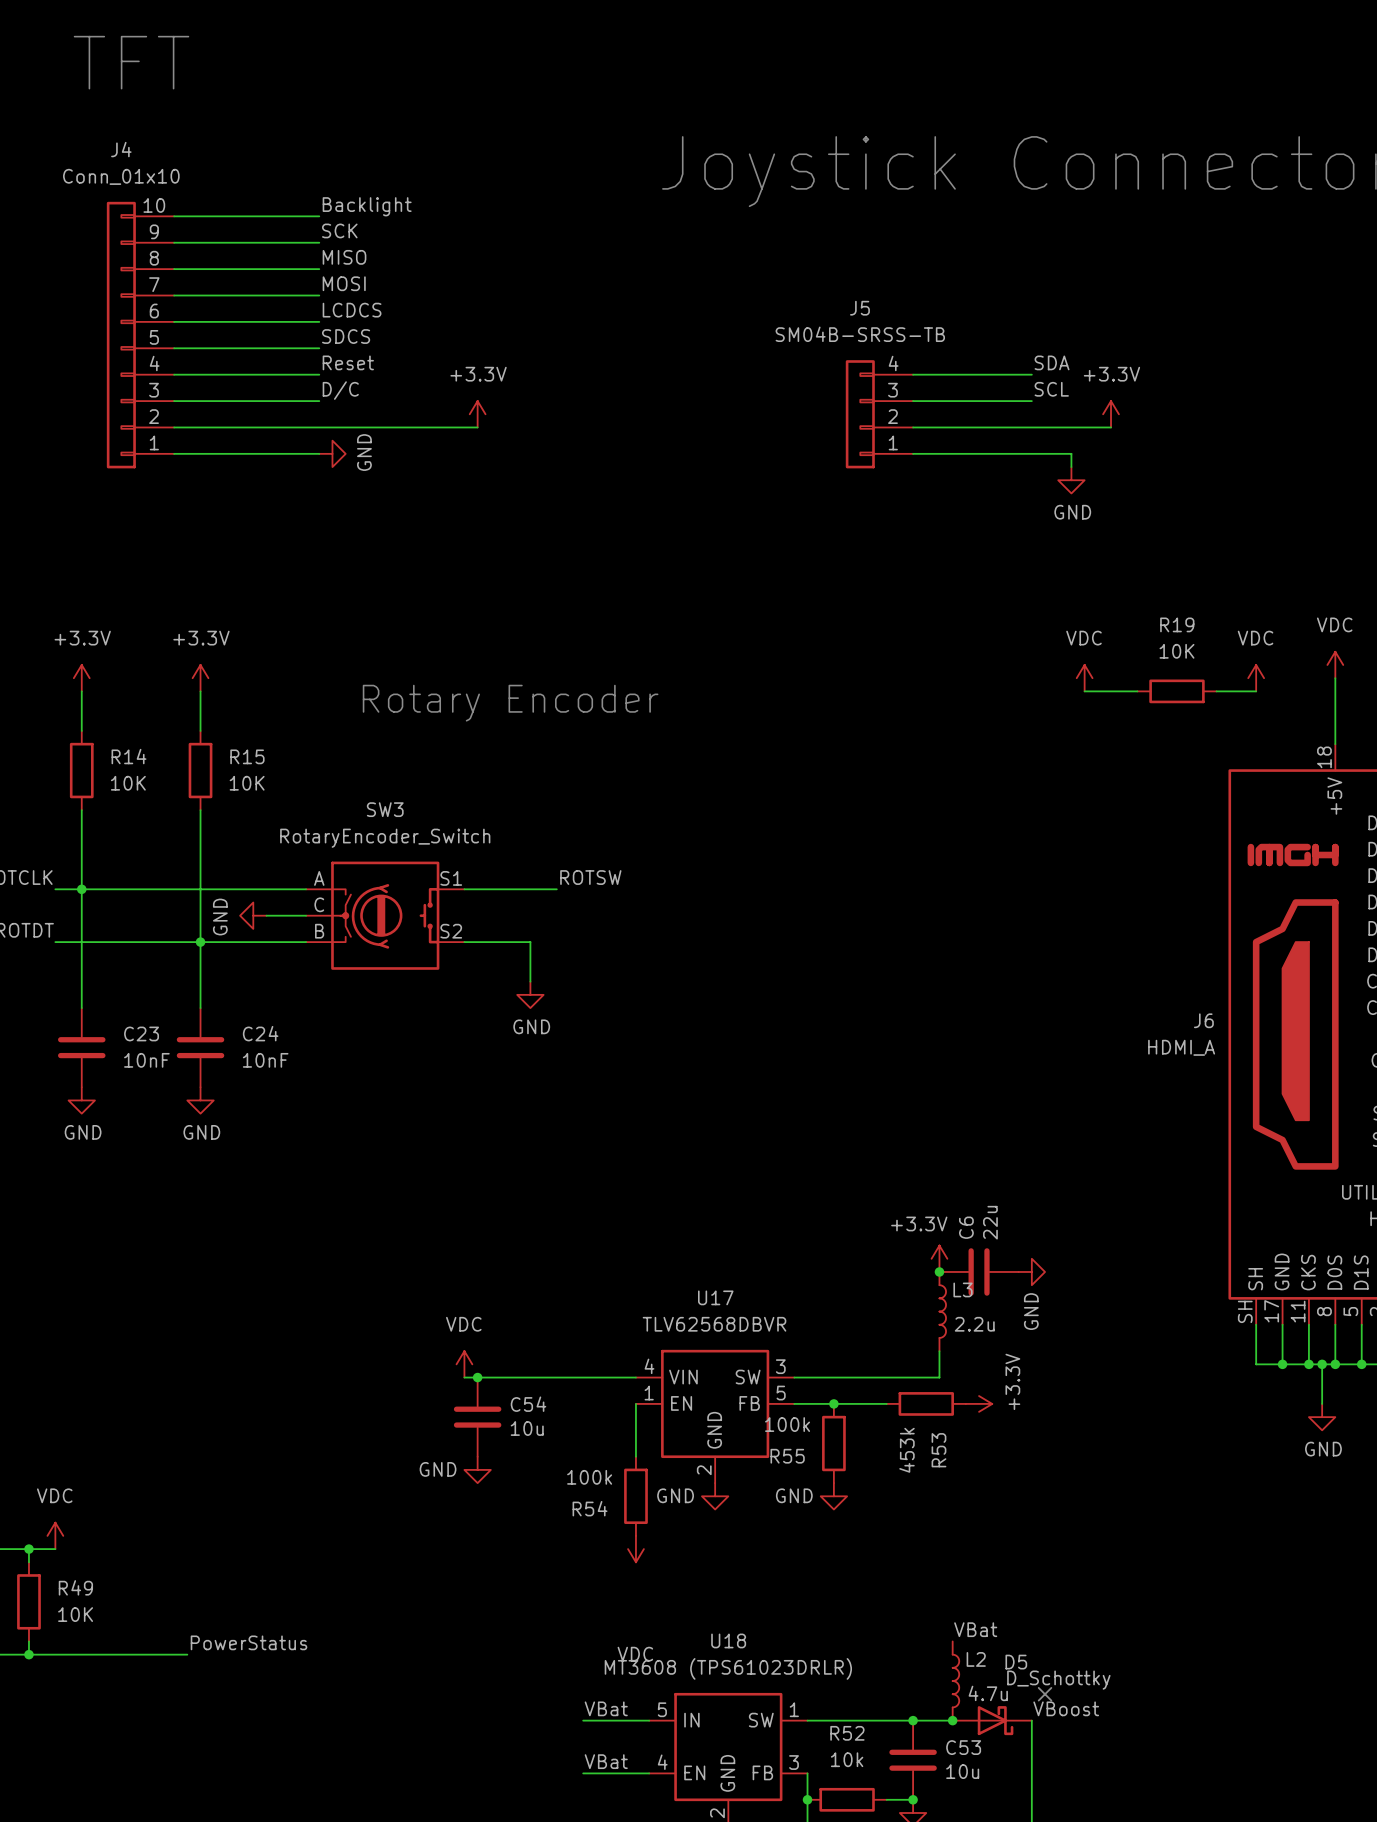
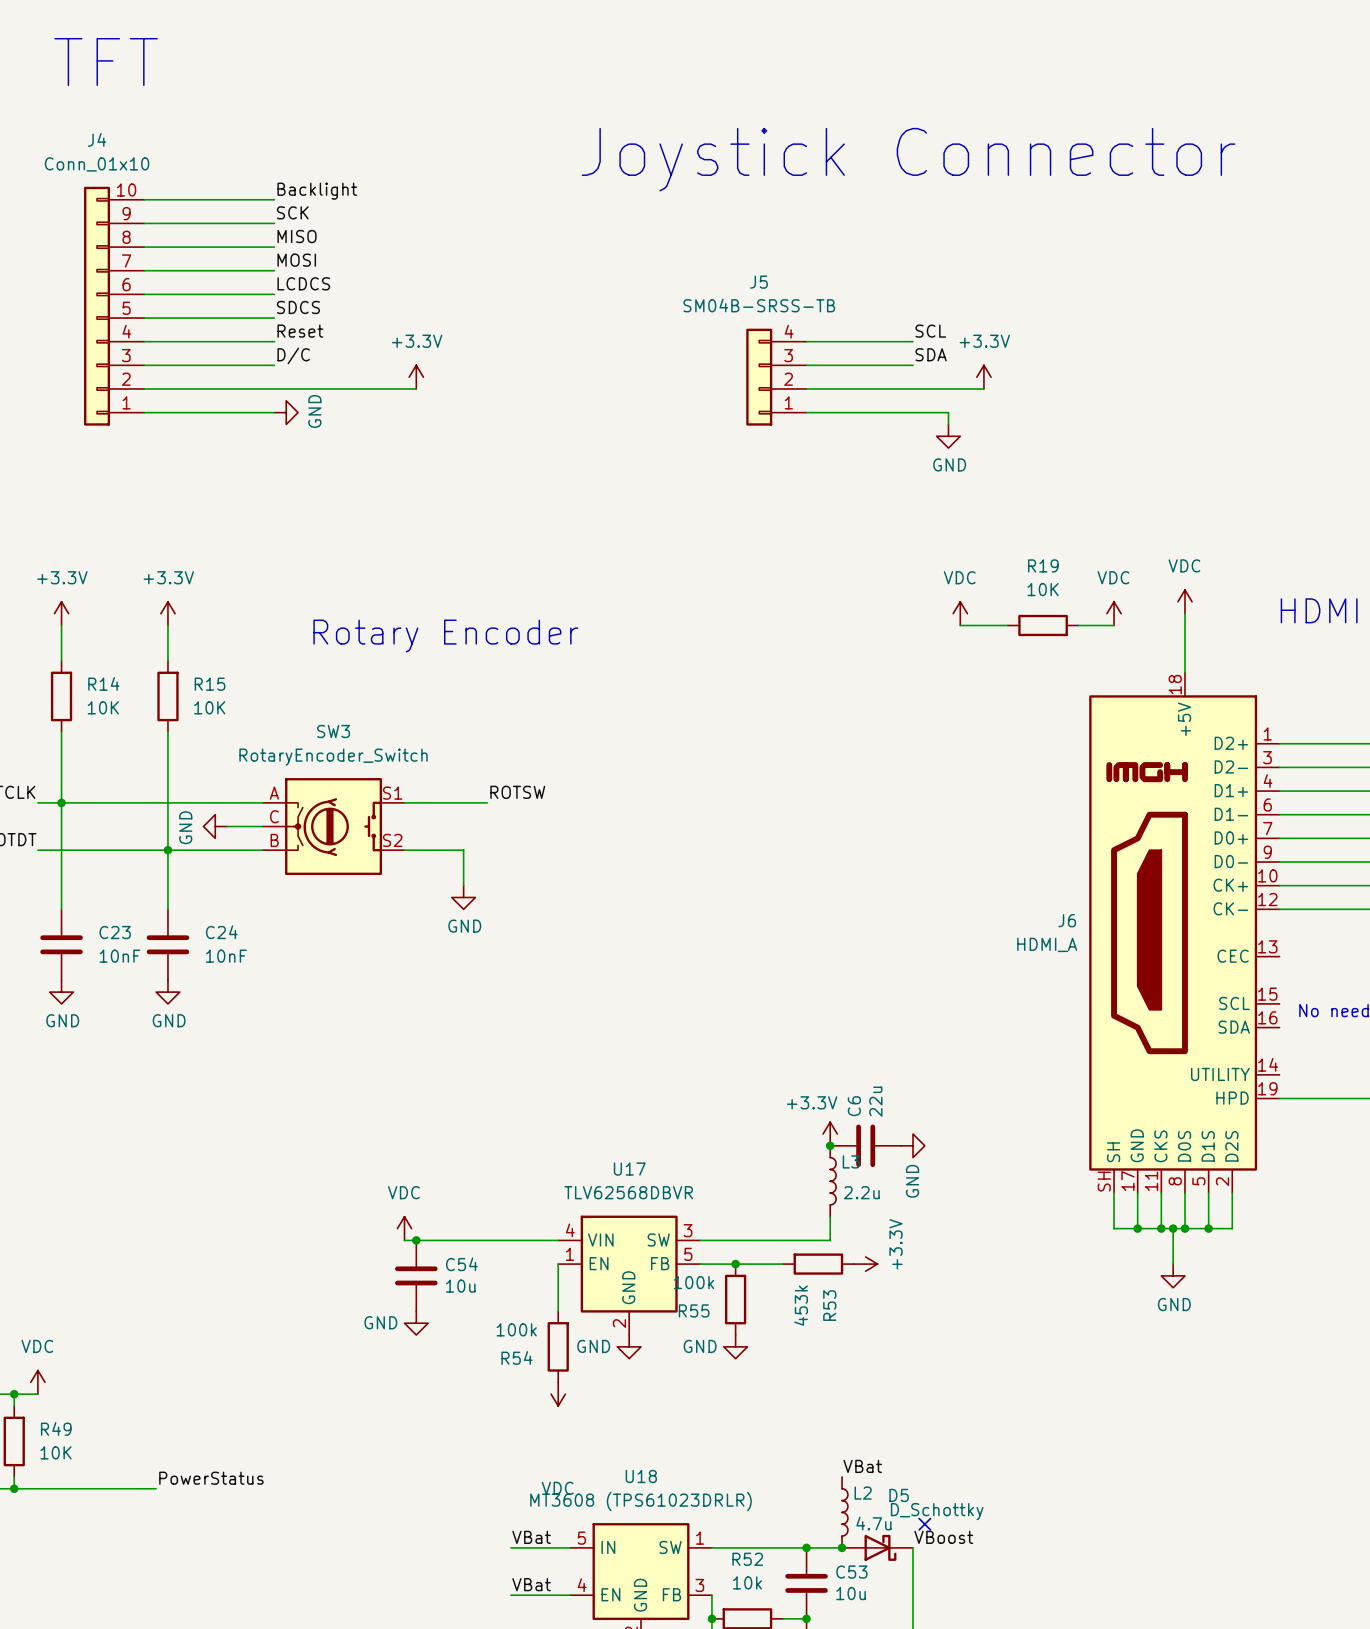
label: SDA (1052, 362) -> SCL (930, 331)
label: SCL (1051, 389) -> SDA (931, 354)

